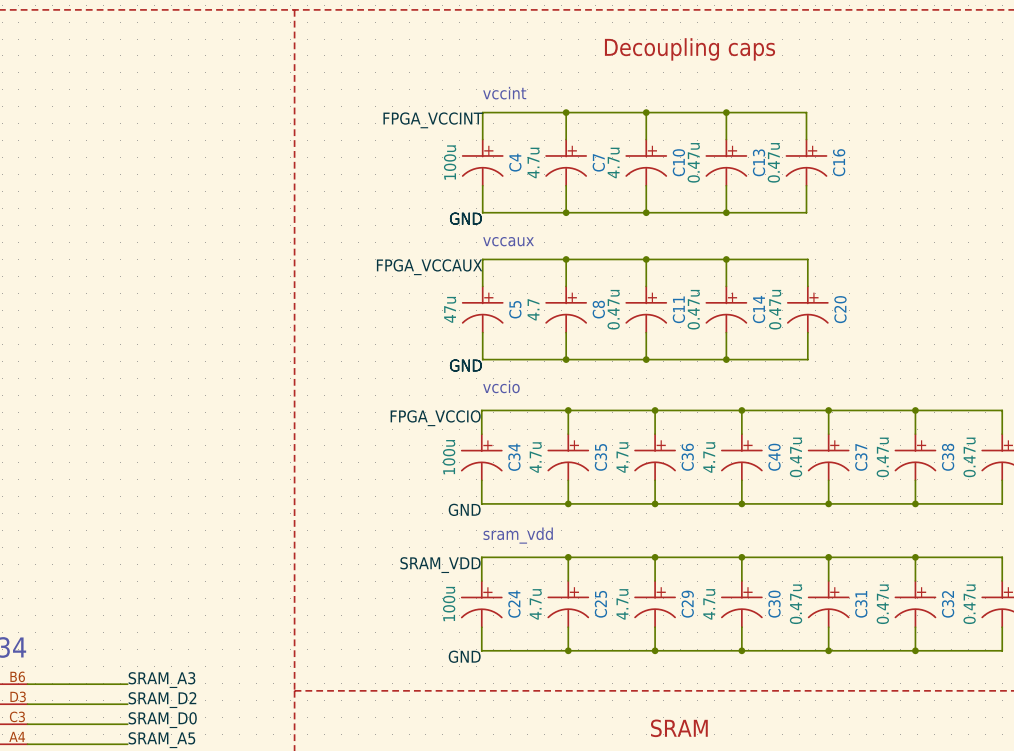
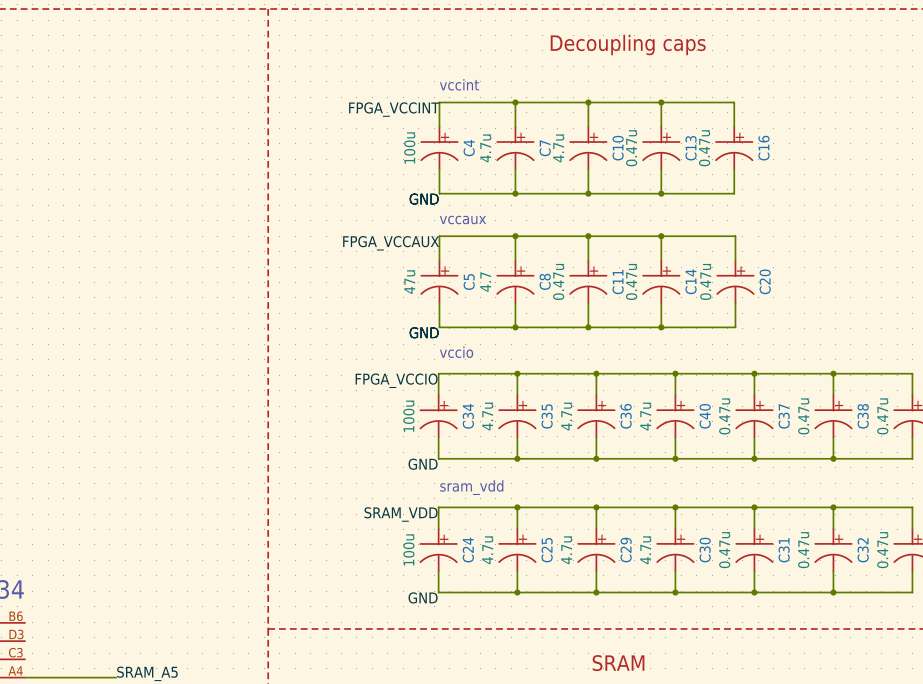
label: SRAM_A3 (161, 680) -> none
wire: (27, 684) (127, 684) -> none
label: SRAM_D2 (162, 700) -> none
wire: (27, 704) (127, 704) -> none
label: SRAM_D0 (162, 720) -> none
wire: (27, 724) (127, 724) -> none

